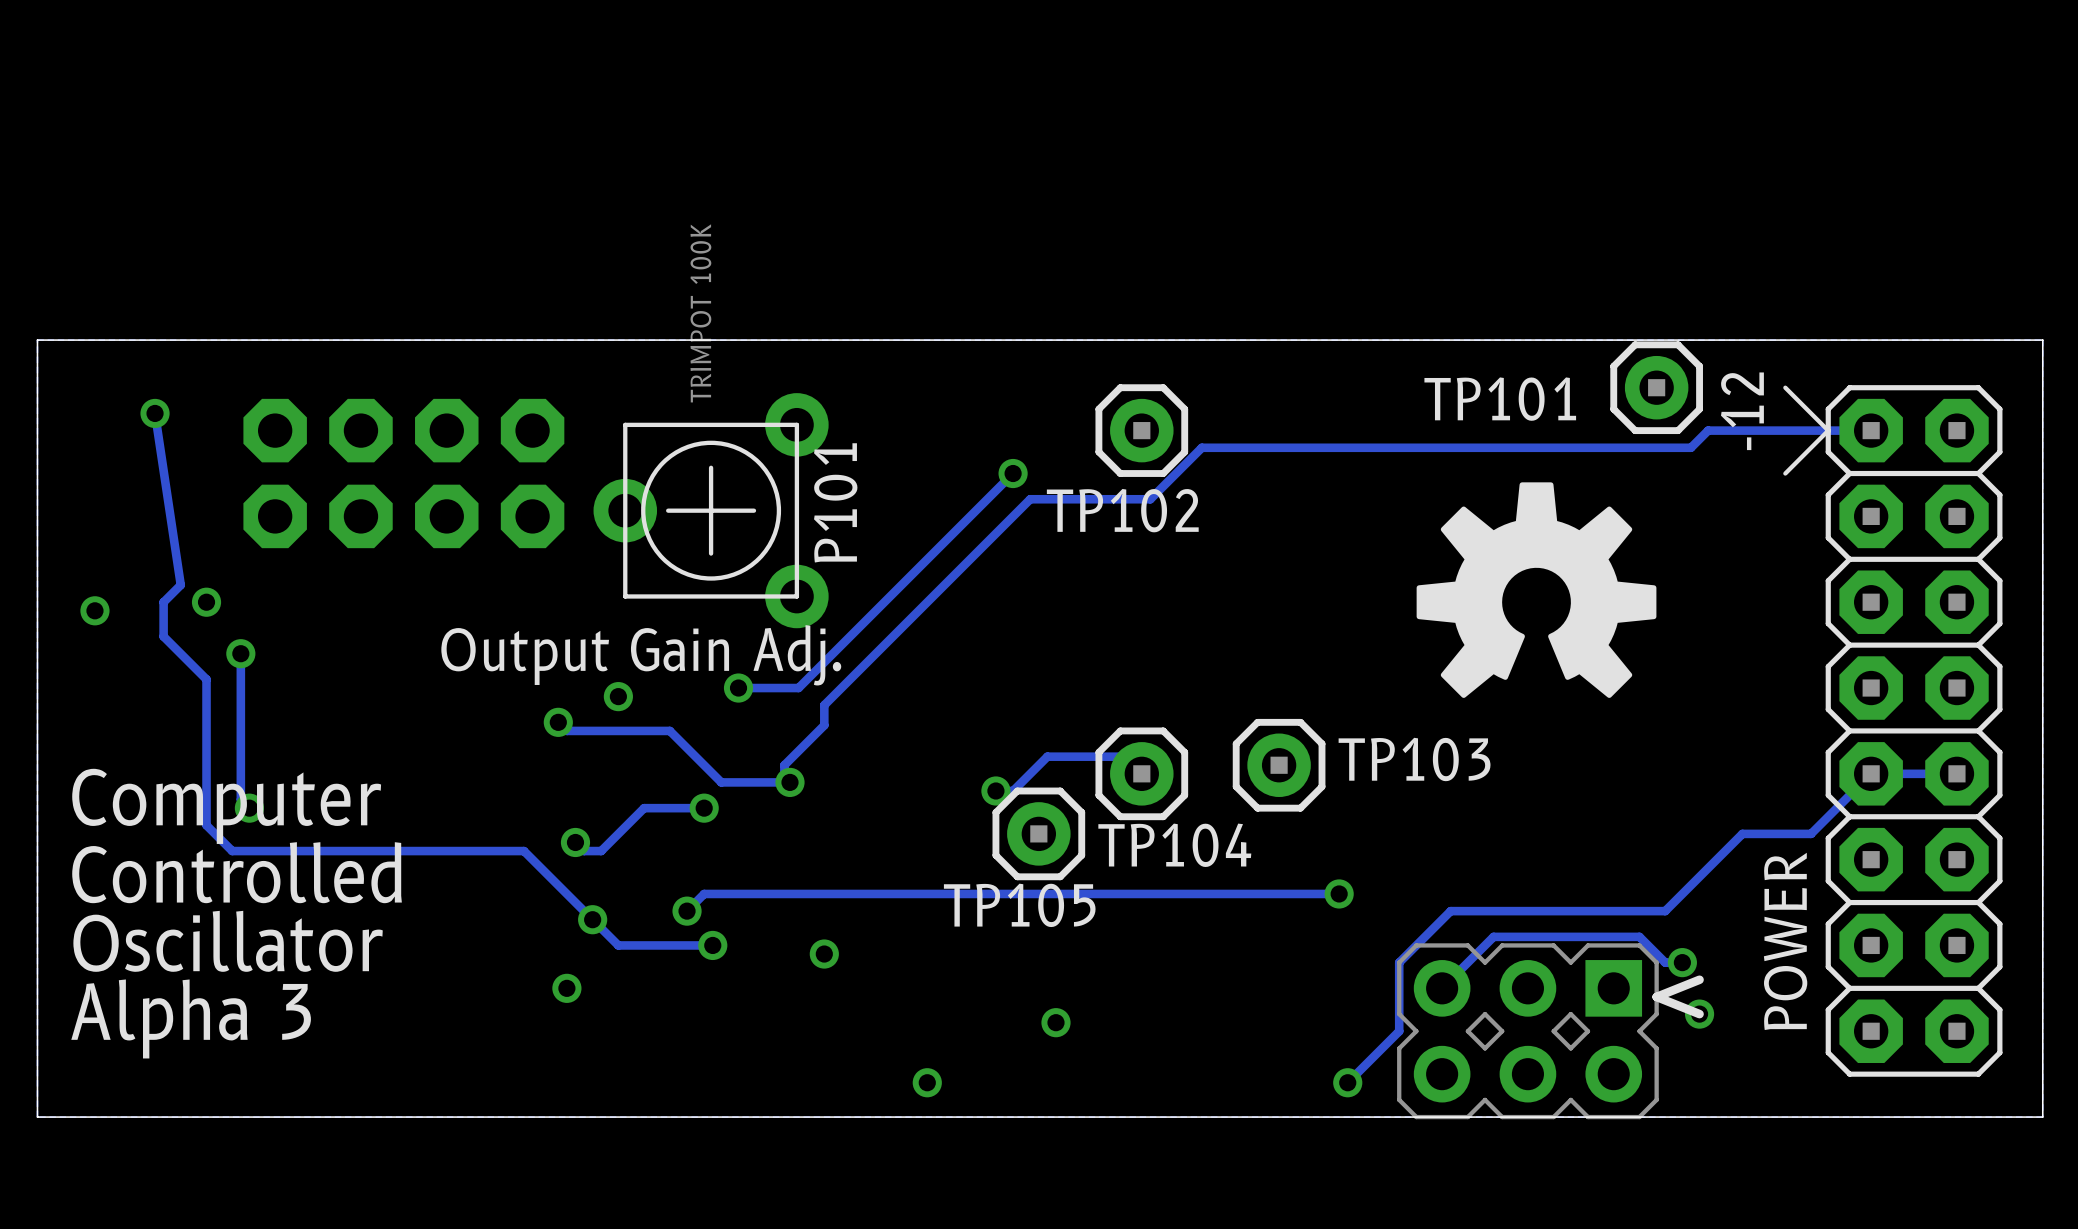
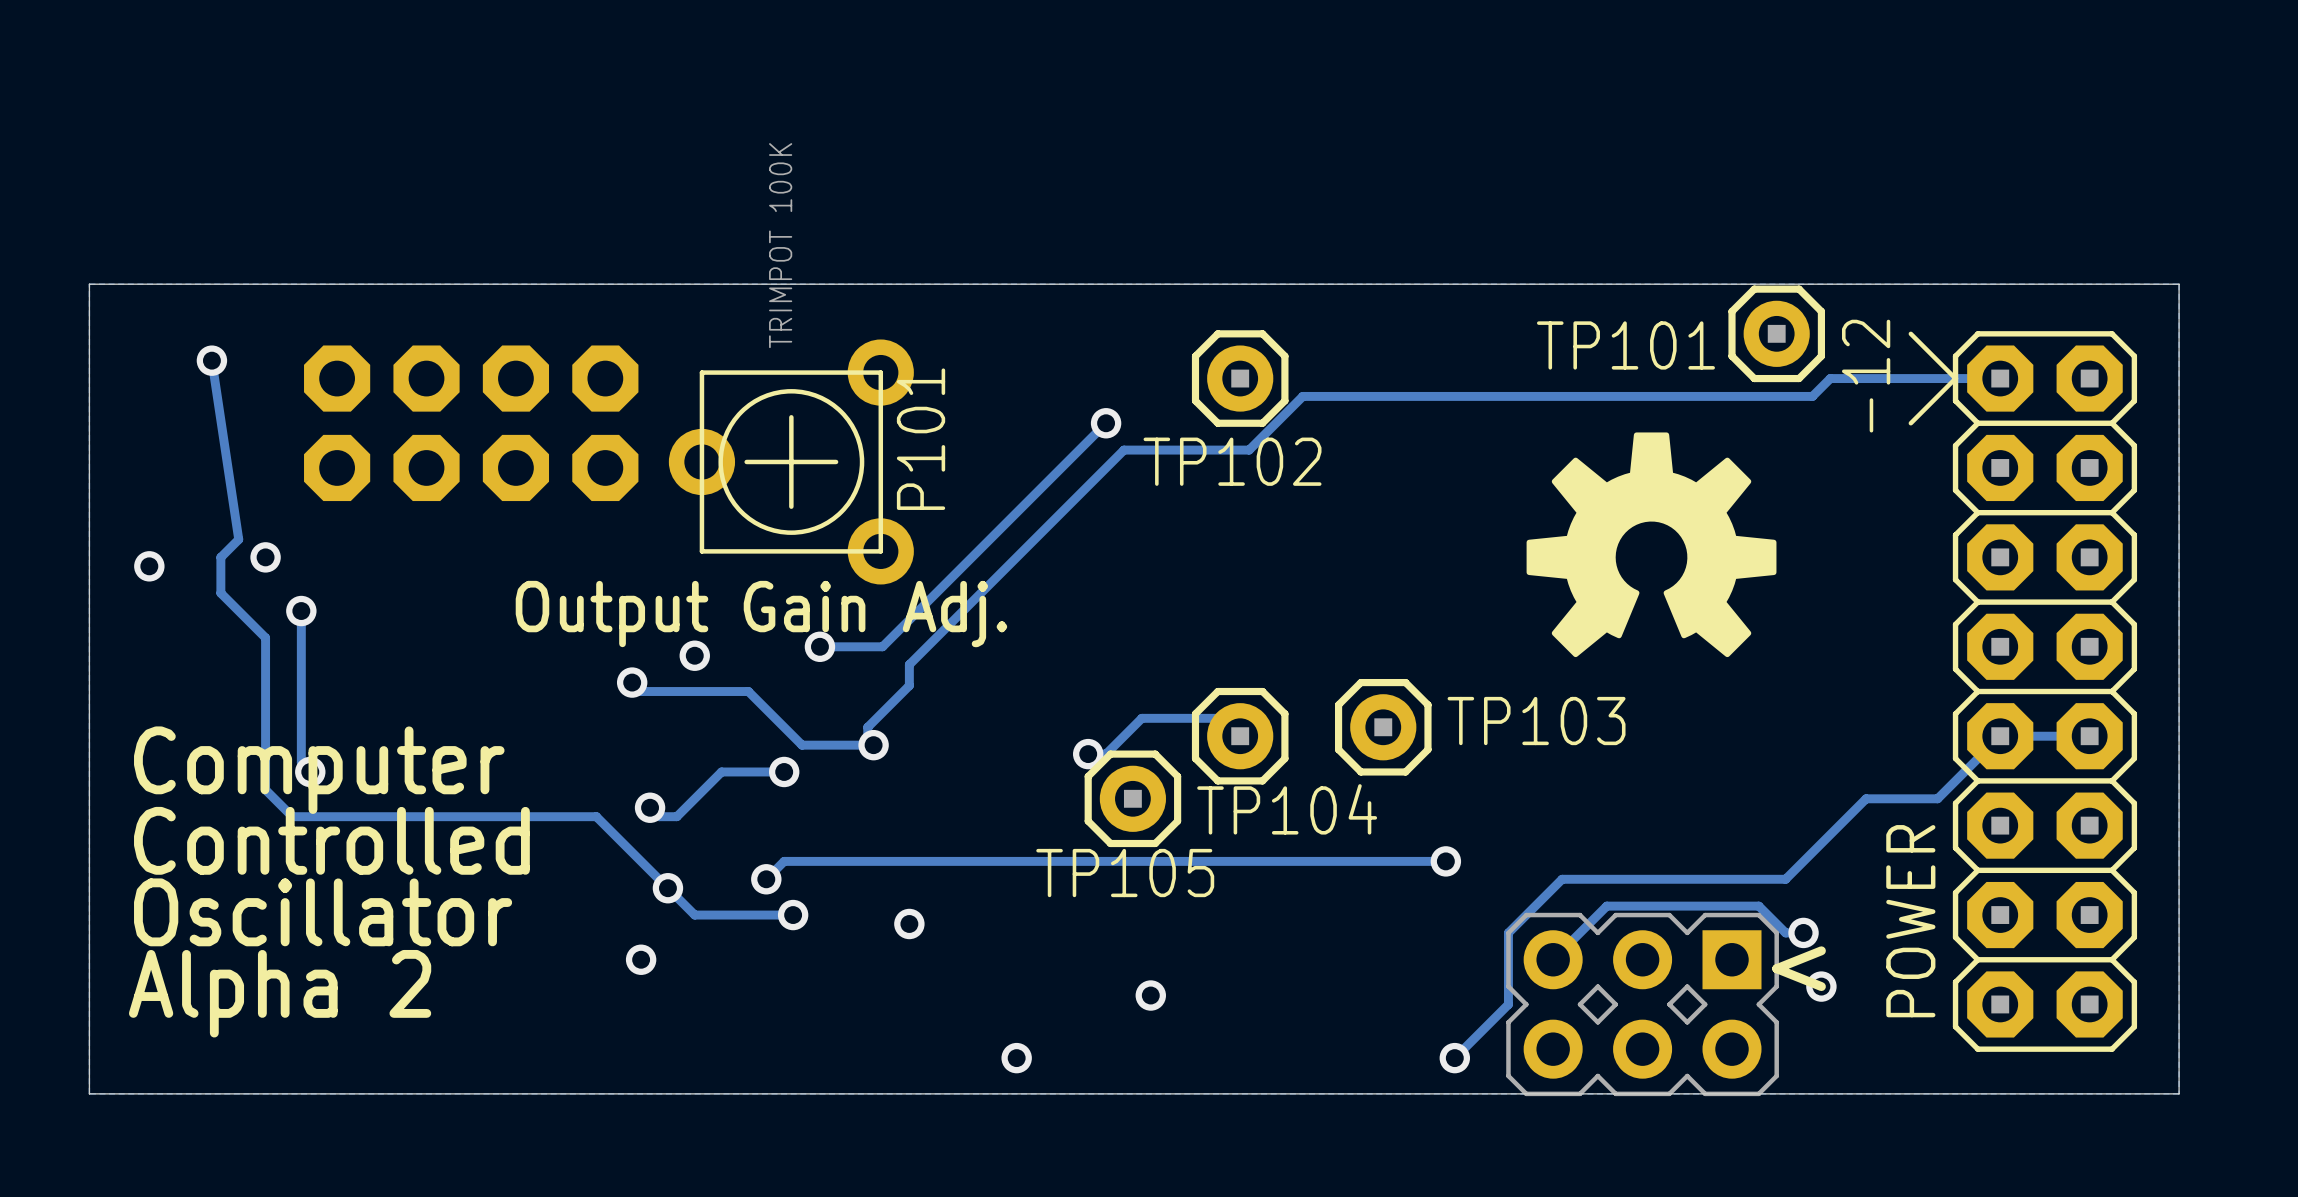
text: Alpha 3 (191, 1018) -> Alpha 2 (280, 993)

